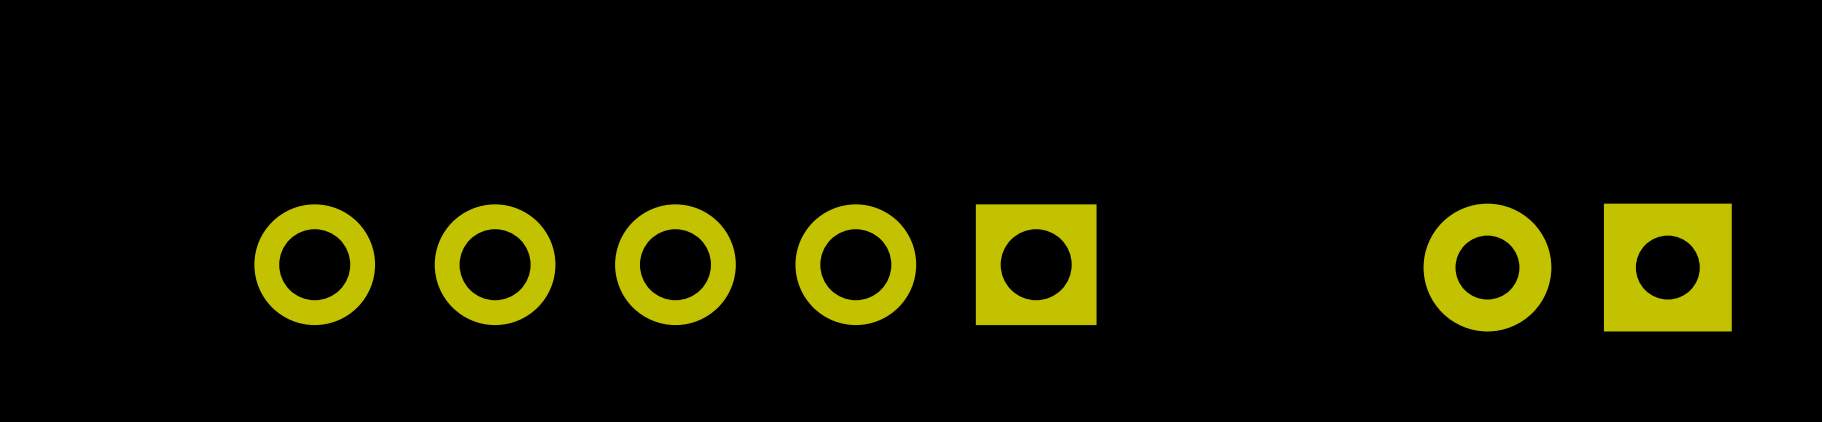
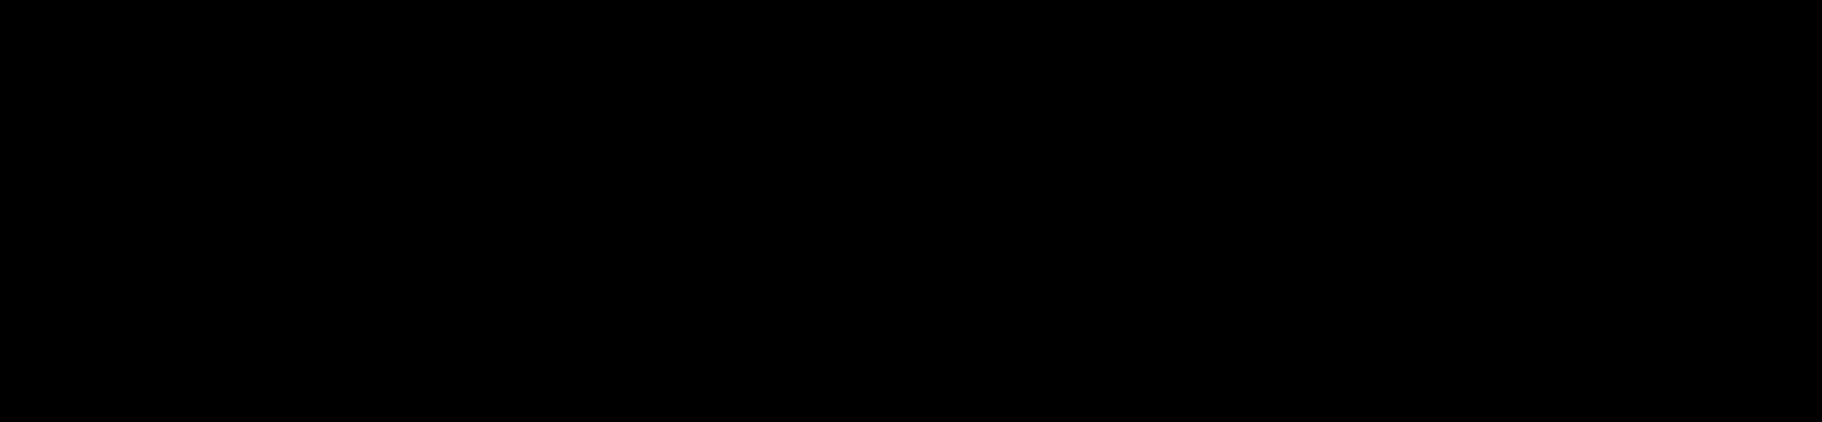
part: (675, 264) -> none
part: (1577, 267) -> none

